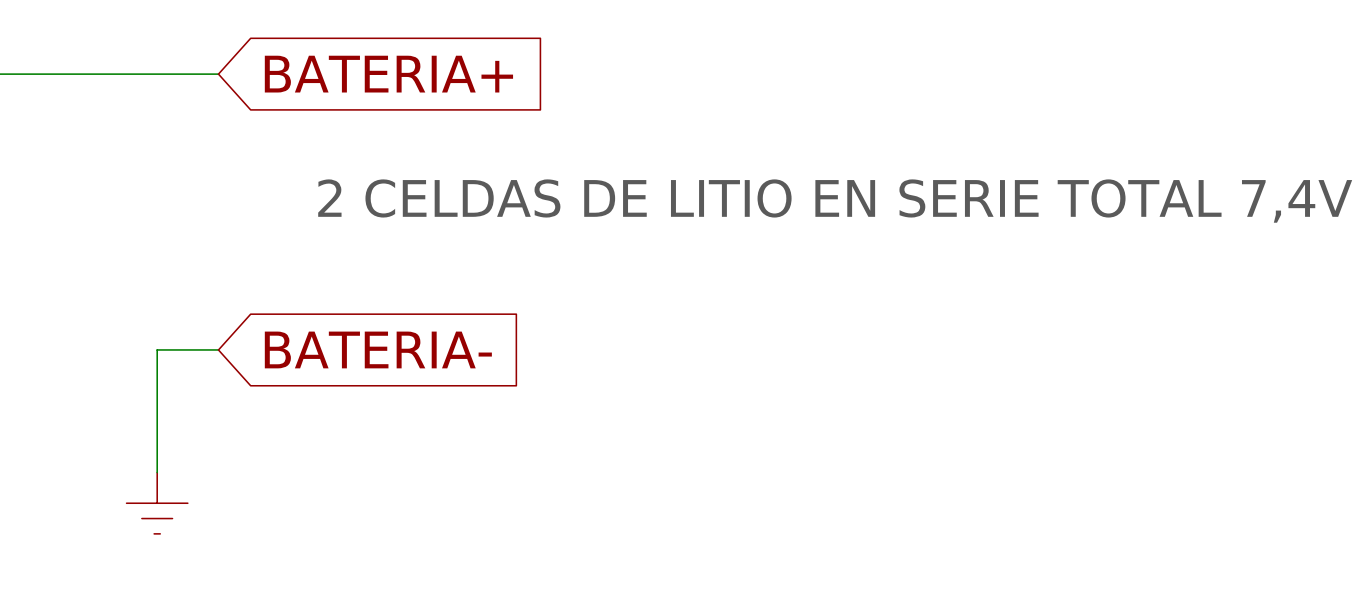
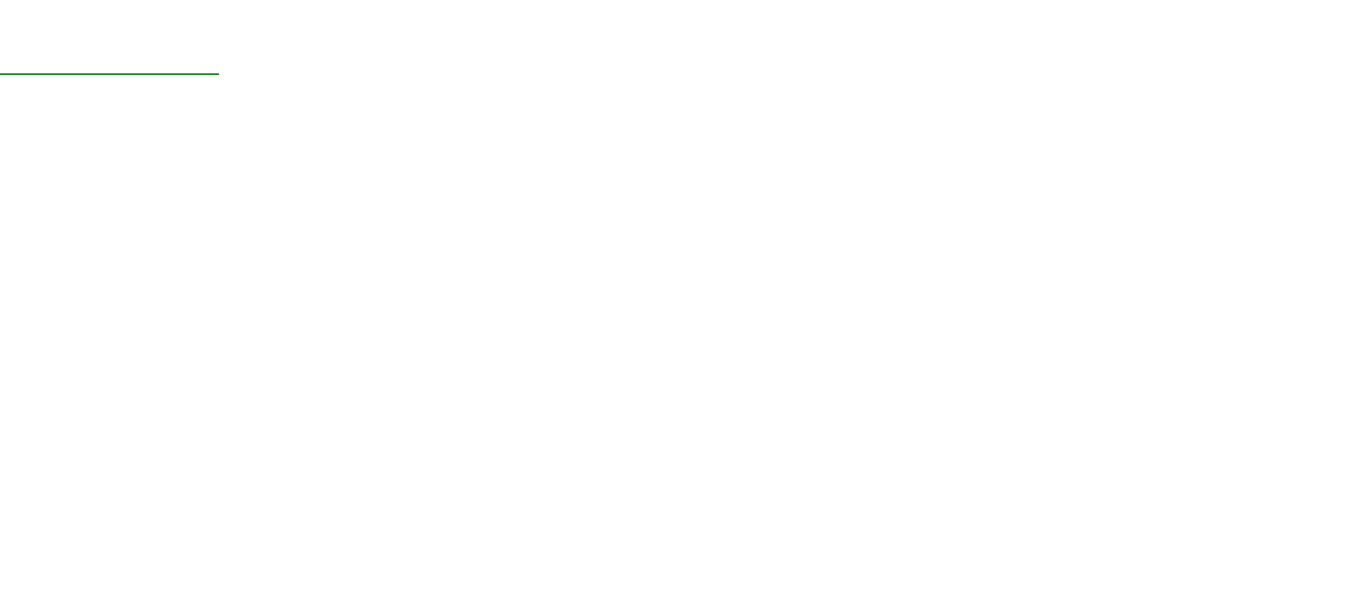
global label: BATERIA+ (388, 74) -> none
text: 2 CELDAS DE LITIO EN SERIE TOTAL 7,4V (835, 201) -> none
wire: (218, 349) (157, 349) (157, 472) -> none
global label: BATERIA- (378, 349) -> none
power symbol: (157, 503) -> none

